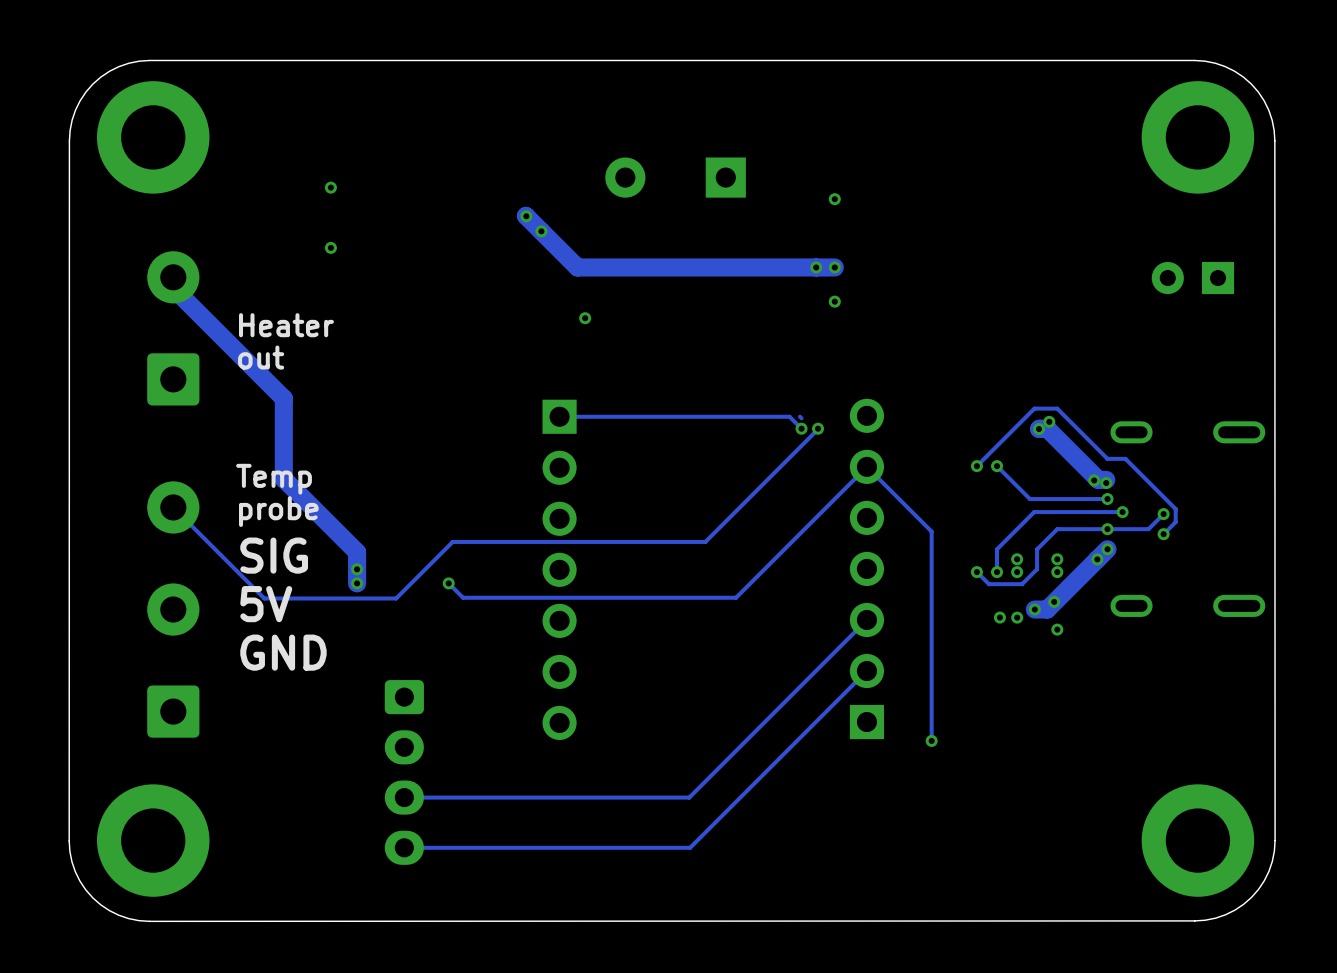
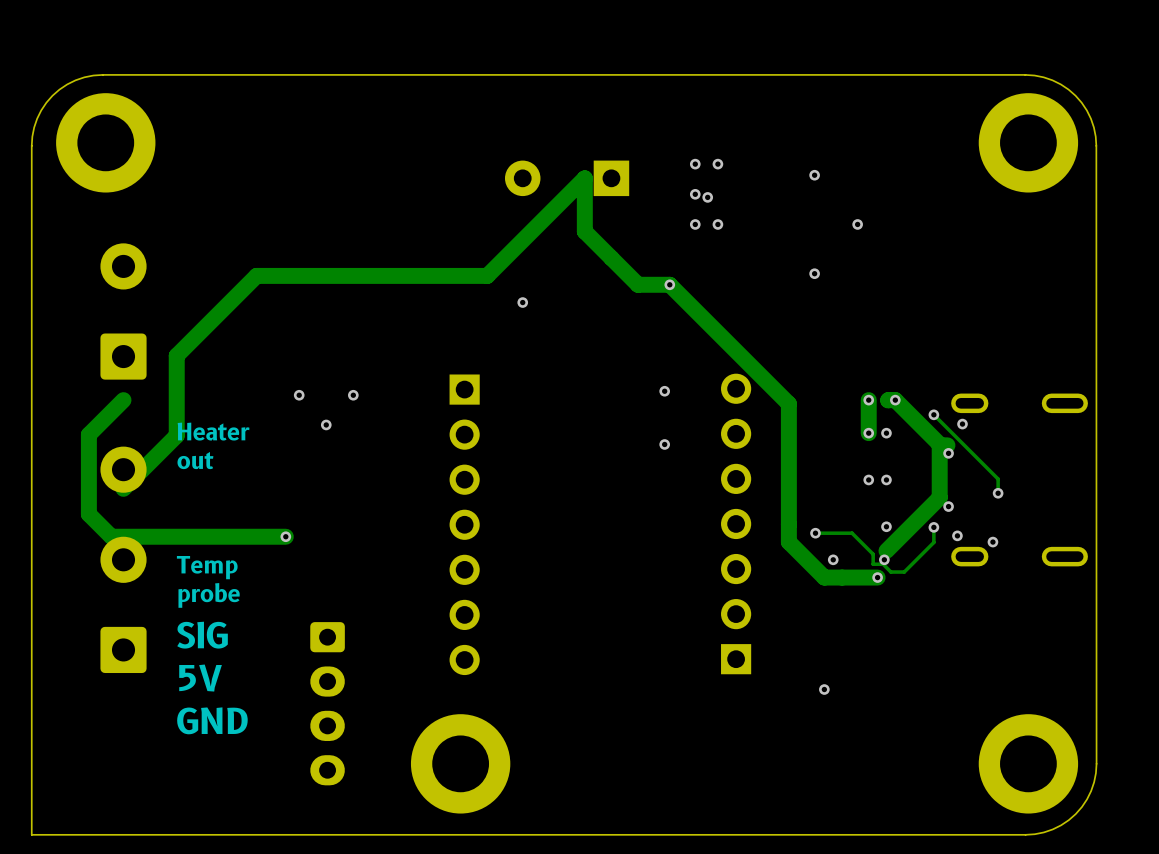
board edge: (69, 140) (69, 840) (71, 861) (79, 881) (100, 904) (118, 915) (149, 921) (1194, 920) -> (31, 145) (31, 834) (1025, 834)
via: none -> (695, 164)
via: none -> (717, 164)
via: none -> (814, 175)
via: (330, 187) -> none
via: none -> (695, 194)
track: (525, 215) (577, 267) (834, 267) -> none
via: (526, 216) -> none
via: none -> (695, 224)
via: none -> (717, 224)
via: none -> (857, 224)
via: (541, 231) -> none
via: (330, 247) -> none
via: (816, 267) -> none
via: (834, 267) -> none
part: (1192, 278) -> none
via: none -> (814, 273)
track: (173, 288) (283, 398) (283, 478) (357, 552) (357, 583) -> (123, 400) (88, 434) (88, 514) (111, 536) (285, 536)
via: none -> (669, 284)
via: (834, 301) -> none
via position: (585, 318) -> (522, 302)
text position: Heater (286, 325) -> Heater (213, 431)
text position: out (261, 357) -> out (195, 460)
track: (559, 416) (789, 416) (801, 428) -> none
track: (800, 416) (801, 418) -> none
via: none -> (664, 391)
via: (1049, 421) -> none
via: none -> (299, 395)
via: none -> (353, 395)
via: (801, 428) -> none
track: (818, 428) (705, 541) (452, 541) (396, 598) (264, 598) (173, 507) -> none
via: (818, 428) -> none
track: none -> (868, 400) (868, 433)
via: none -> (868, 400)
via: none -> (895, 400)
via: (1039, 429) -> none
via: none -> (933, 414)
via: none -> (962, 424)
via: none -> (326, 424)
track: (976, 466) (1034, 408) (1057, 408) (1107, 458) (1125, 458) (1175, 509) (1175, 522) (1163, 534) -> (933, 414) (998, 479) (998, 493)
via: (976, 466) -> none
track: (997, 466) (1029, 499) (1107, 499) -> none
via: (997, 466) -> none
via: none -> (868, 433)
via: none -> (886, 433)
via: none -> (664, 444)
track: none -> (939, 444) (939, 497) (886, 550)
text position: Temp (274, 479) -> Temp (207, 567)
via: (1094, 480) -> none
via: (1106, 483) -> none
via: none -> (948, 453)
via: (1107, 499) -> none
text position: probe (278, 511) -> probe (209, 595)
track: (1122, 512) (1034, 512) (997, 549) (997, 572) -> none
via: (1122, 512) -> none
track: (1163, 514) (1148, 529) (1057, 529) (1037, 549) (1037, 569) (1022, 584) (989, 584) (976, 572) -> none
via: (1163, 514) -> none
via: none -> (868, 479)
via: none -> (886, 479)
track: none -> (123, 488) (176, 435) (176, 355) (256, 275) (487, 275) (584, 178) (584, 231) (638, 284) (669, 284) (788, 403) (788, 542) (824, 577) (877, 577)
via: (1107, 529) -> none
track: (1107, 549) (1047, 609) (1034, 609) -> none
text position: SIG (274, 555) -> SIG (202, 635)
via: (1017, 559) -> none
via: (1057, 559) -> none
via position: (1097, 559) -> (933, 527)
via: (357, 569) -> none
via: (976, 572) -> none
via: (997, 572) -> none
via: (1017, 572) -> none
via: none -> (886, 526)
via: (1057, 572) -> none
track: none -> (933, 527) (933, 542) (904, 572) (890, 572) (883, 564) (873, 564) (873, 554) (852, 533) (815, 533)
via: none -> (815, 533)
via: none -> (957, 535)
track: (448, 583) (463, 597) (736, 597) (866, 466) (931, 531) (931, 740) -> none
via: (448, 583) -> none
via: none -> (992, 542)
via: (1054, 601) -> none
text position: 5V (266, 604) -> 5V (200, 678)
via: none -> (833, 559)
via: (999, 617) -> none
via position: (1017, 617) -> (877, 577)
track: (866, 619) (689, 797) (404, 797) -> none
via: (1057, 629) -> none
text position: GND (283, 652) -> GND (212, 720)
track: (866, 671) (690, 847) (404, 847) -> none
via position: (931, 740) -> (824, 689)
part position: (153, 840) -> (460, 763)

